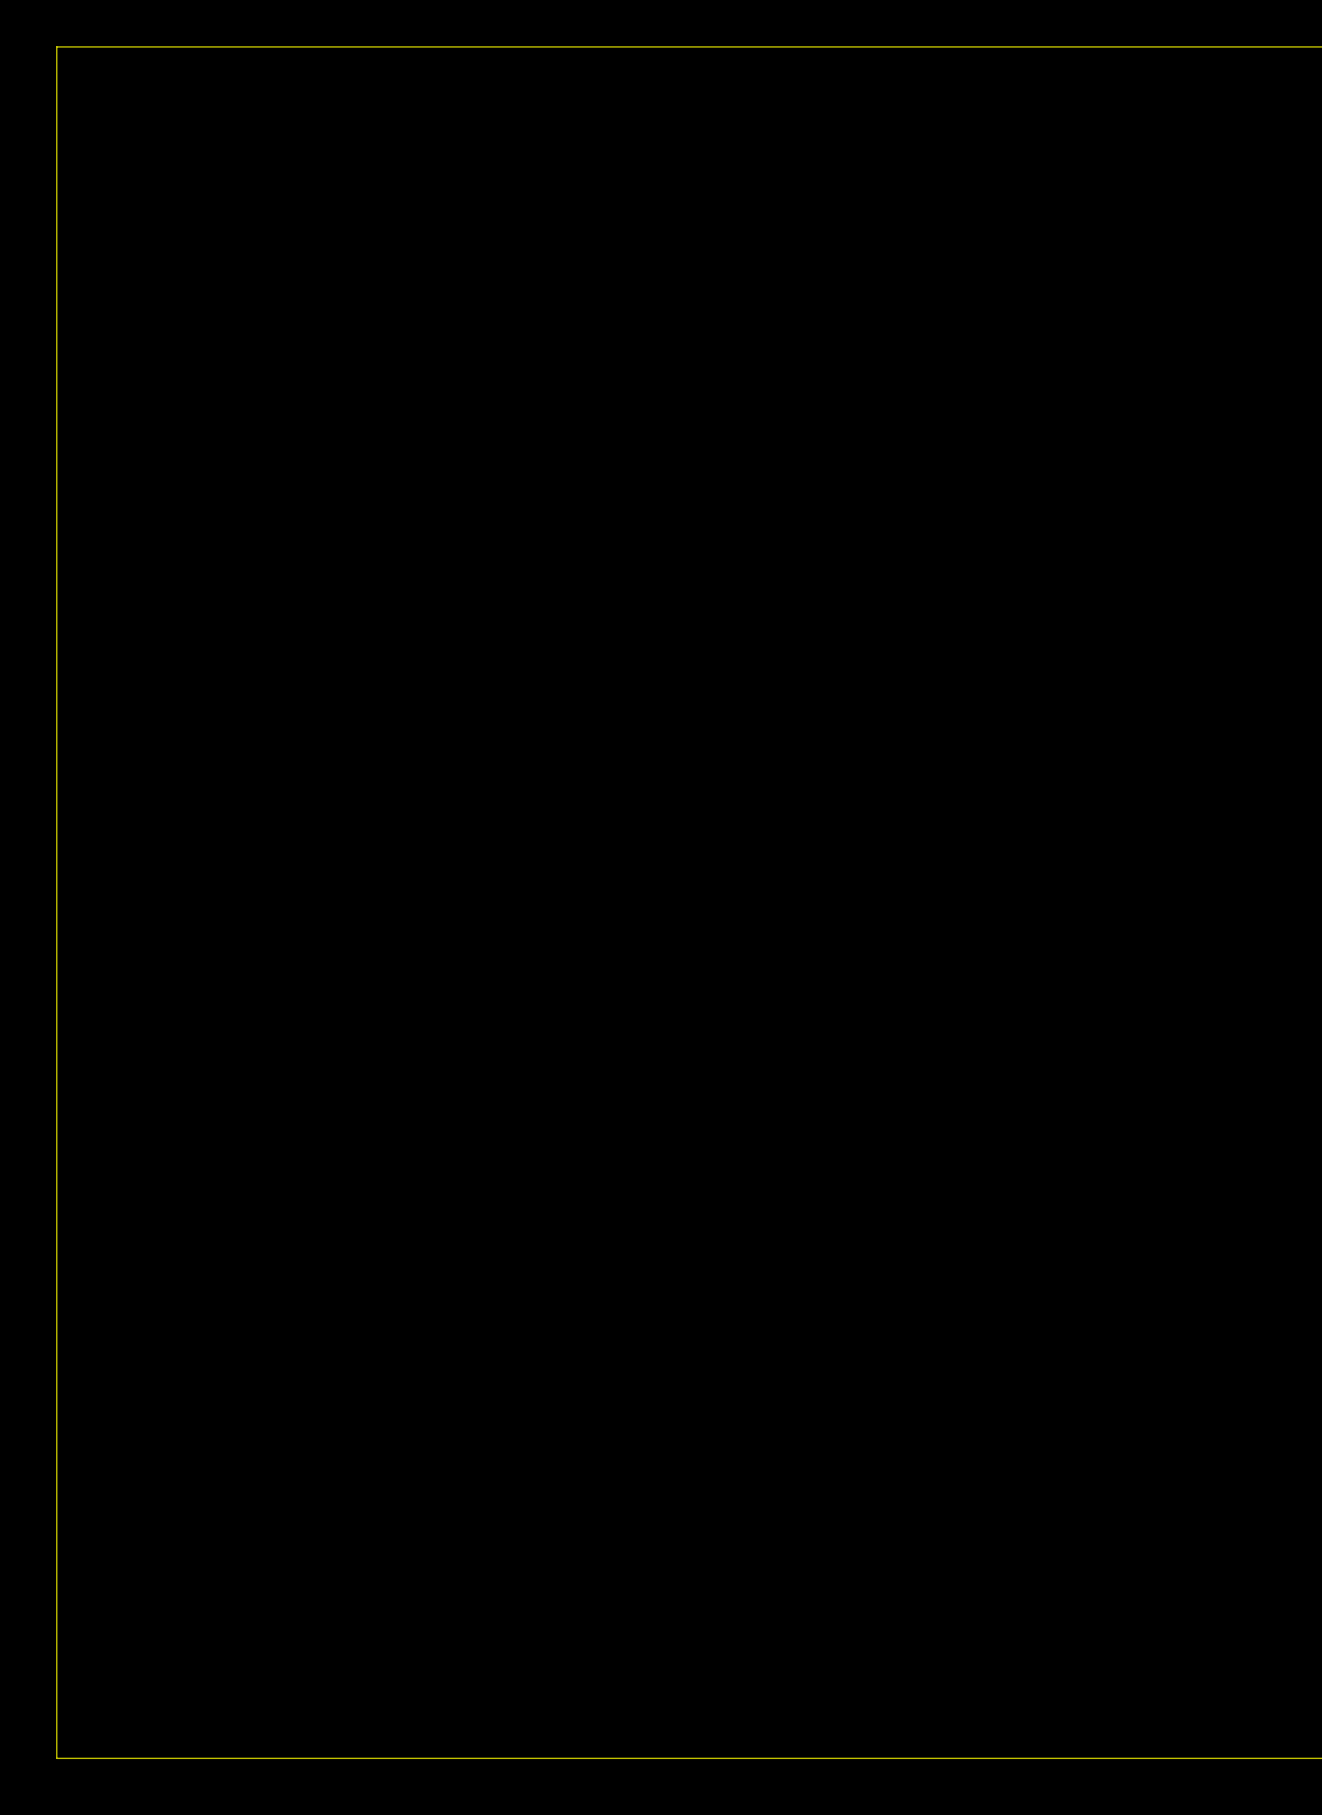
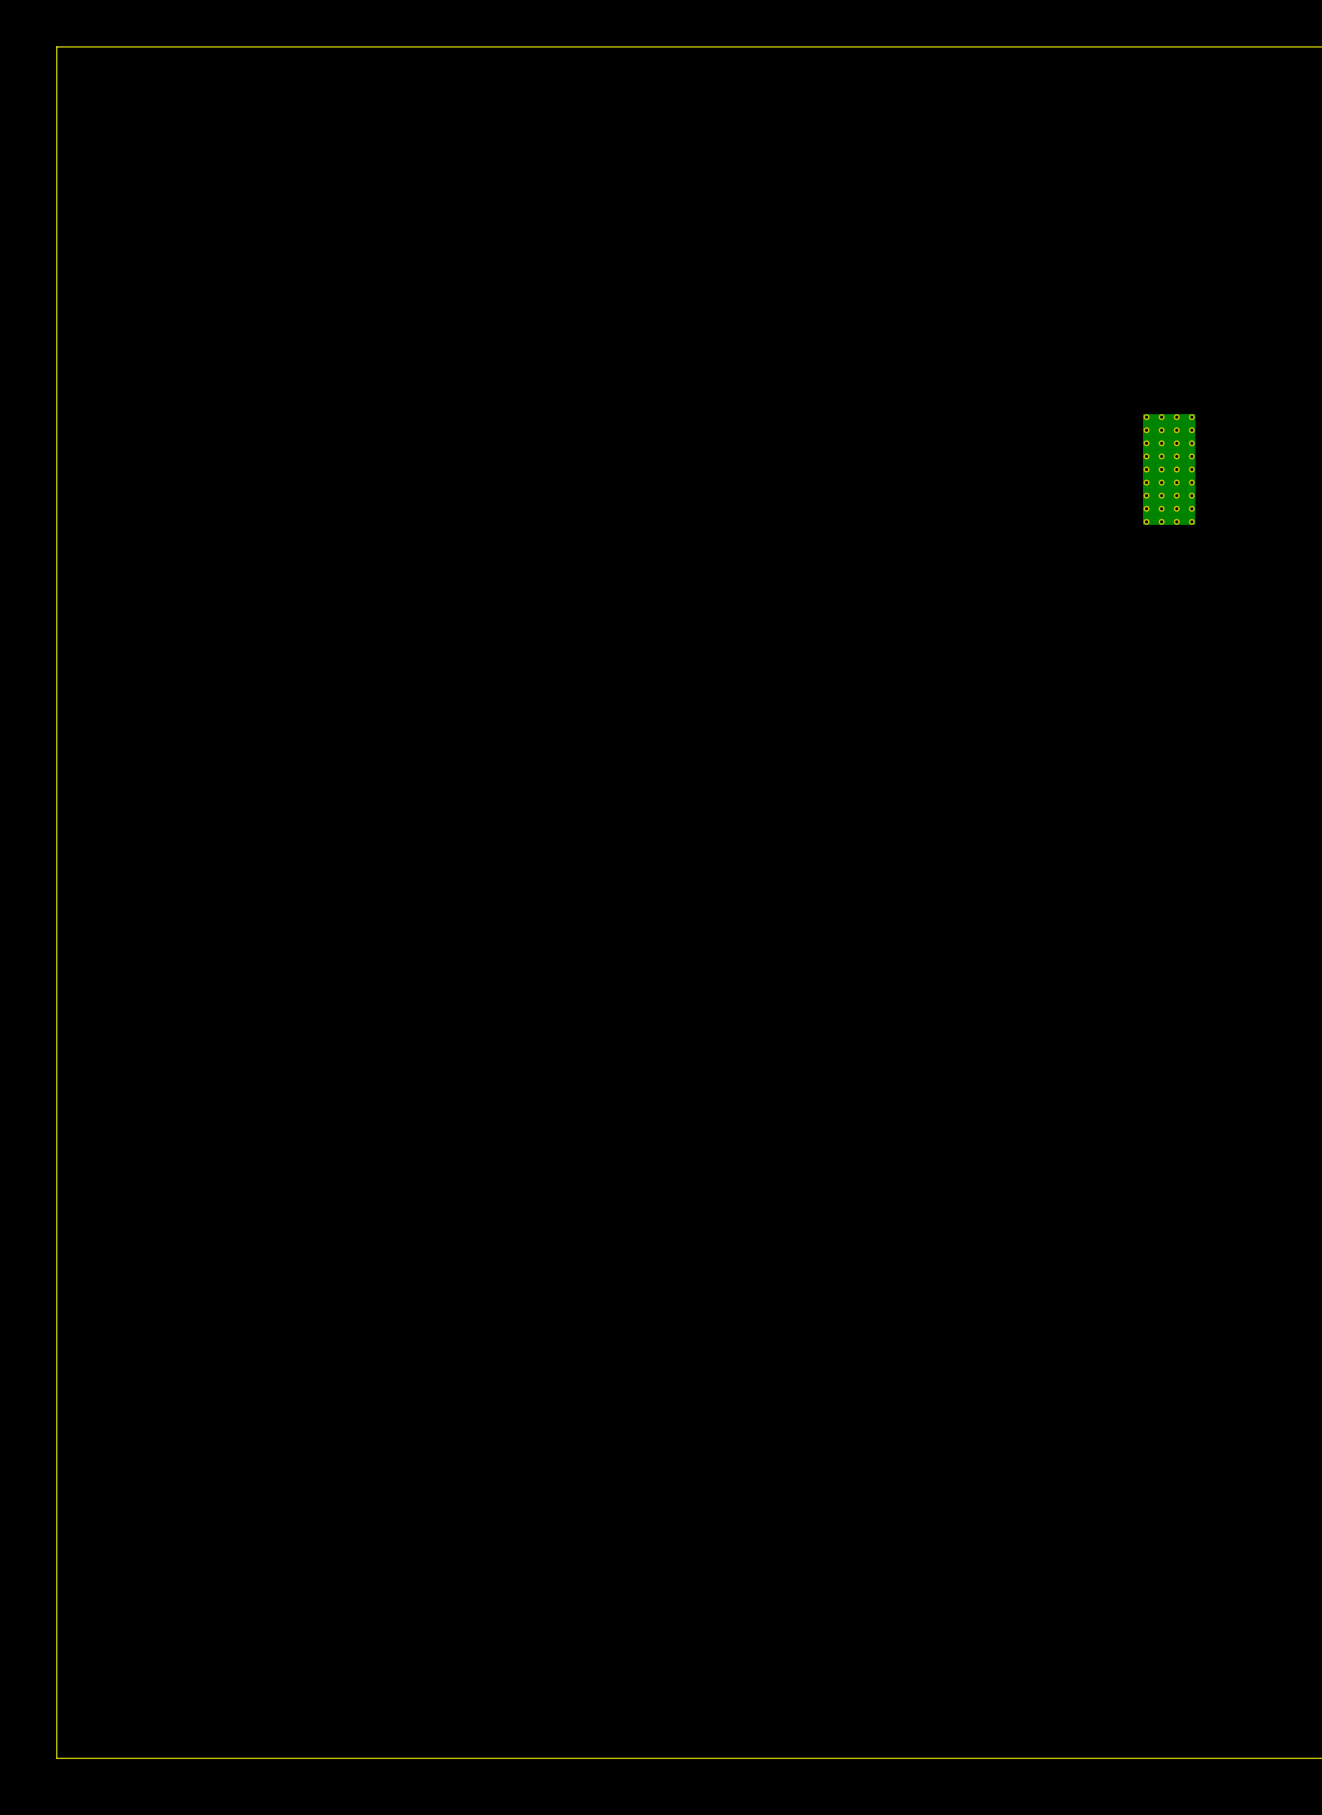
part: none -> (1169, 469)

